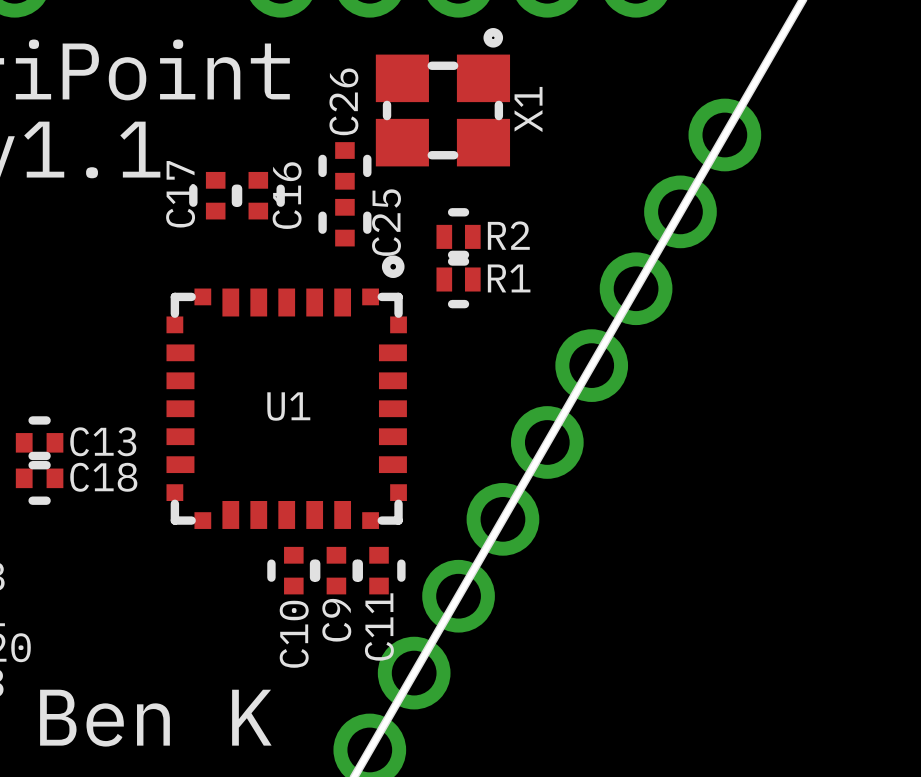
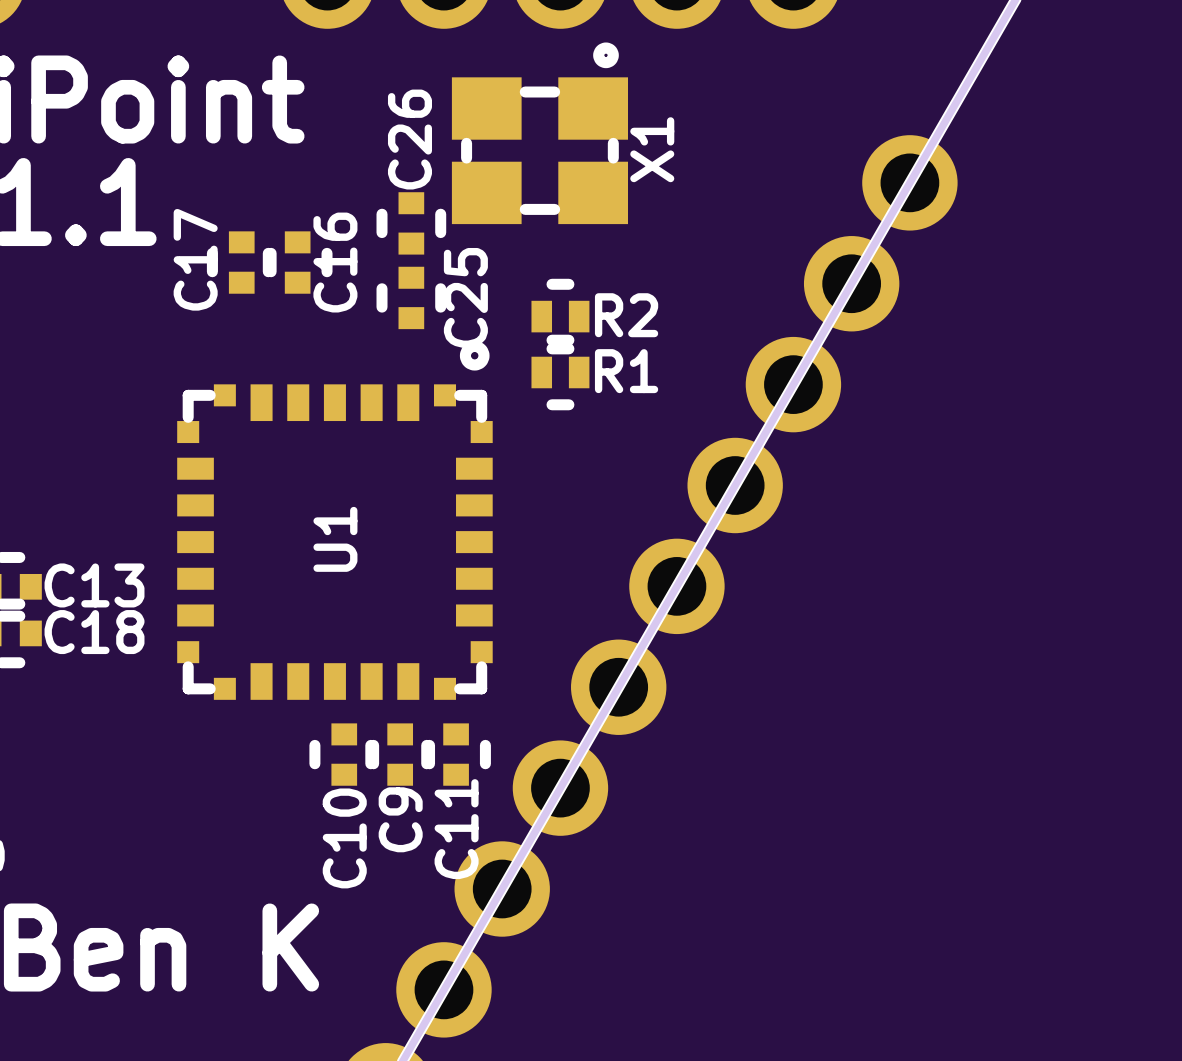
U1 name rotation: 0° (288, 406) -> 90° counterclockwise (335, 539)

